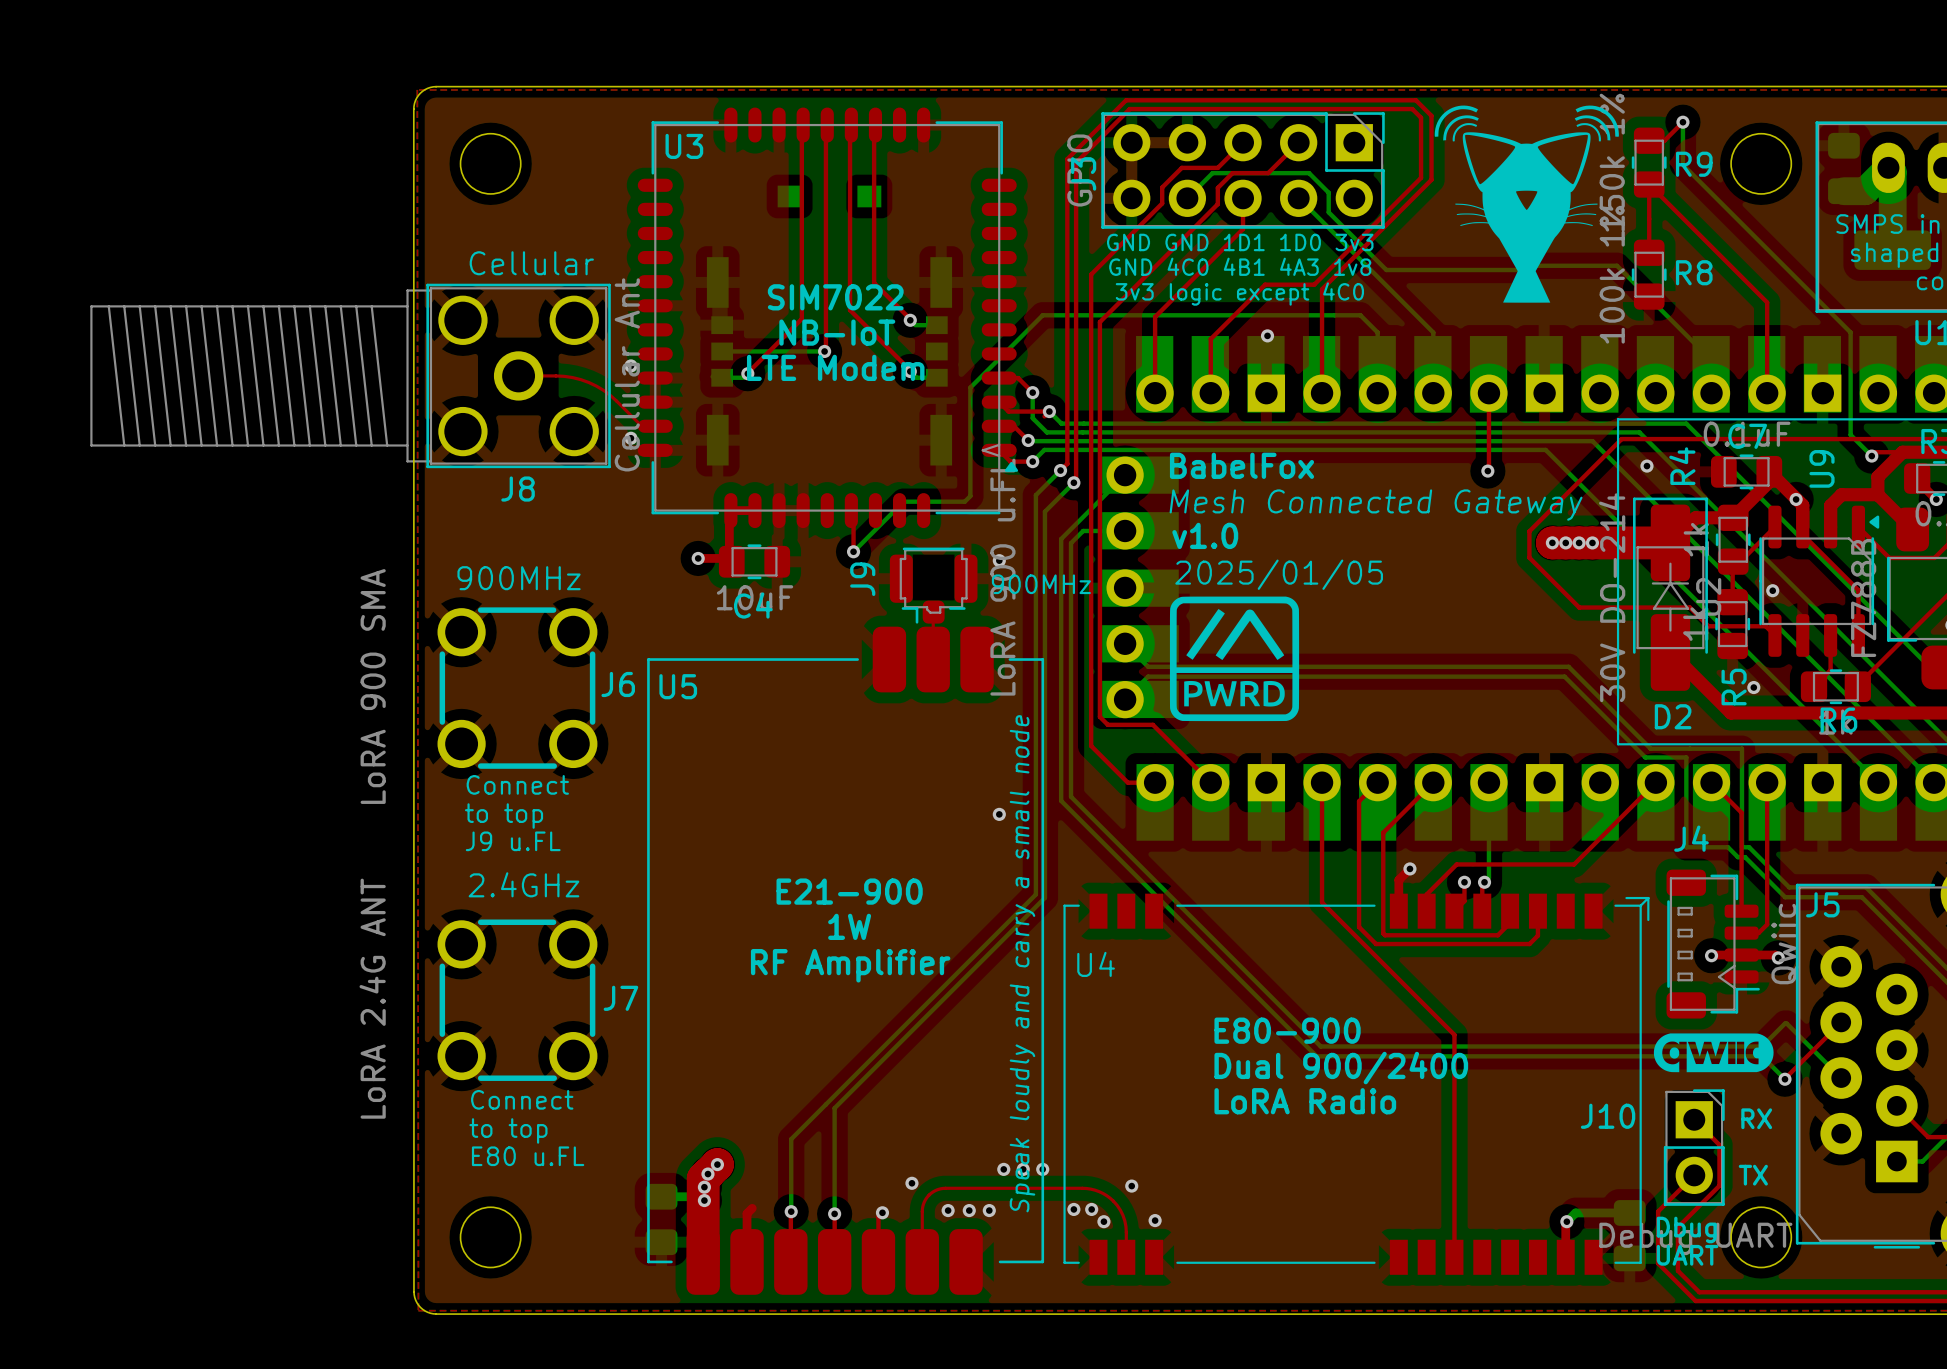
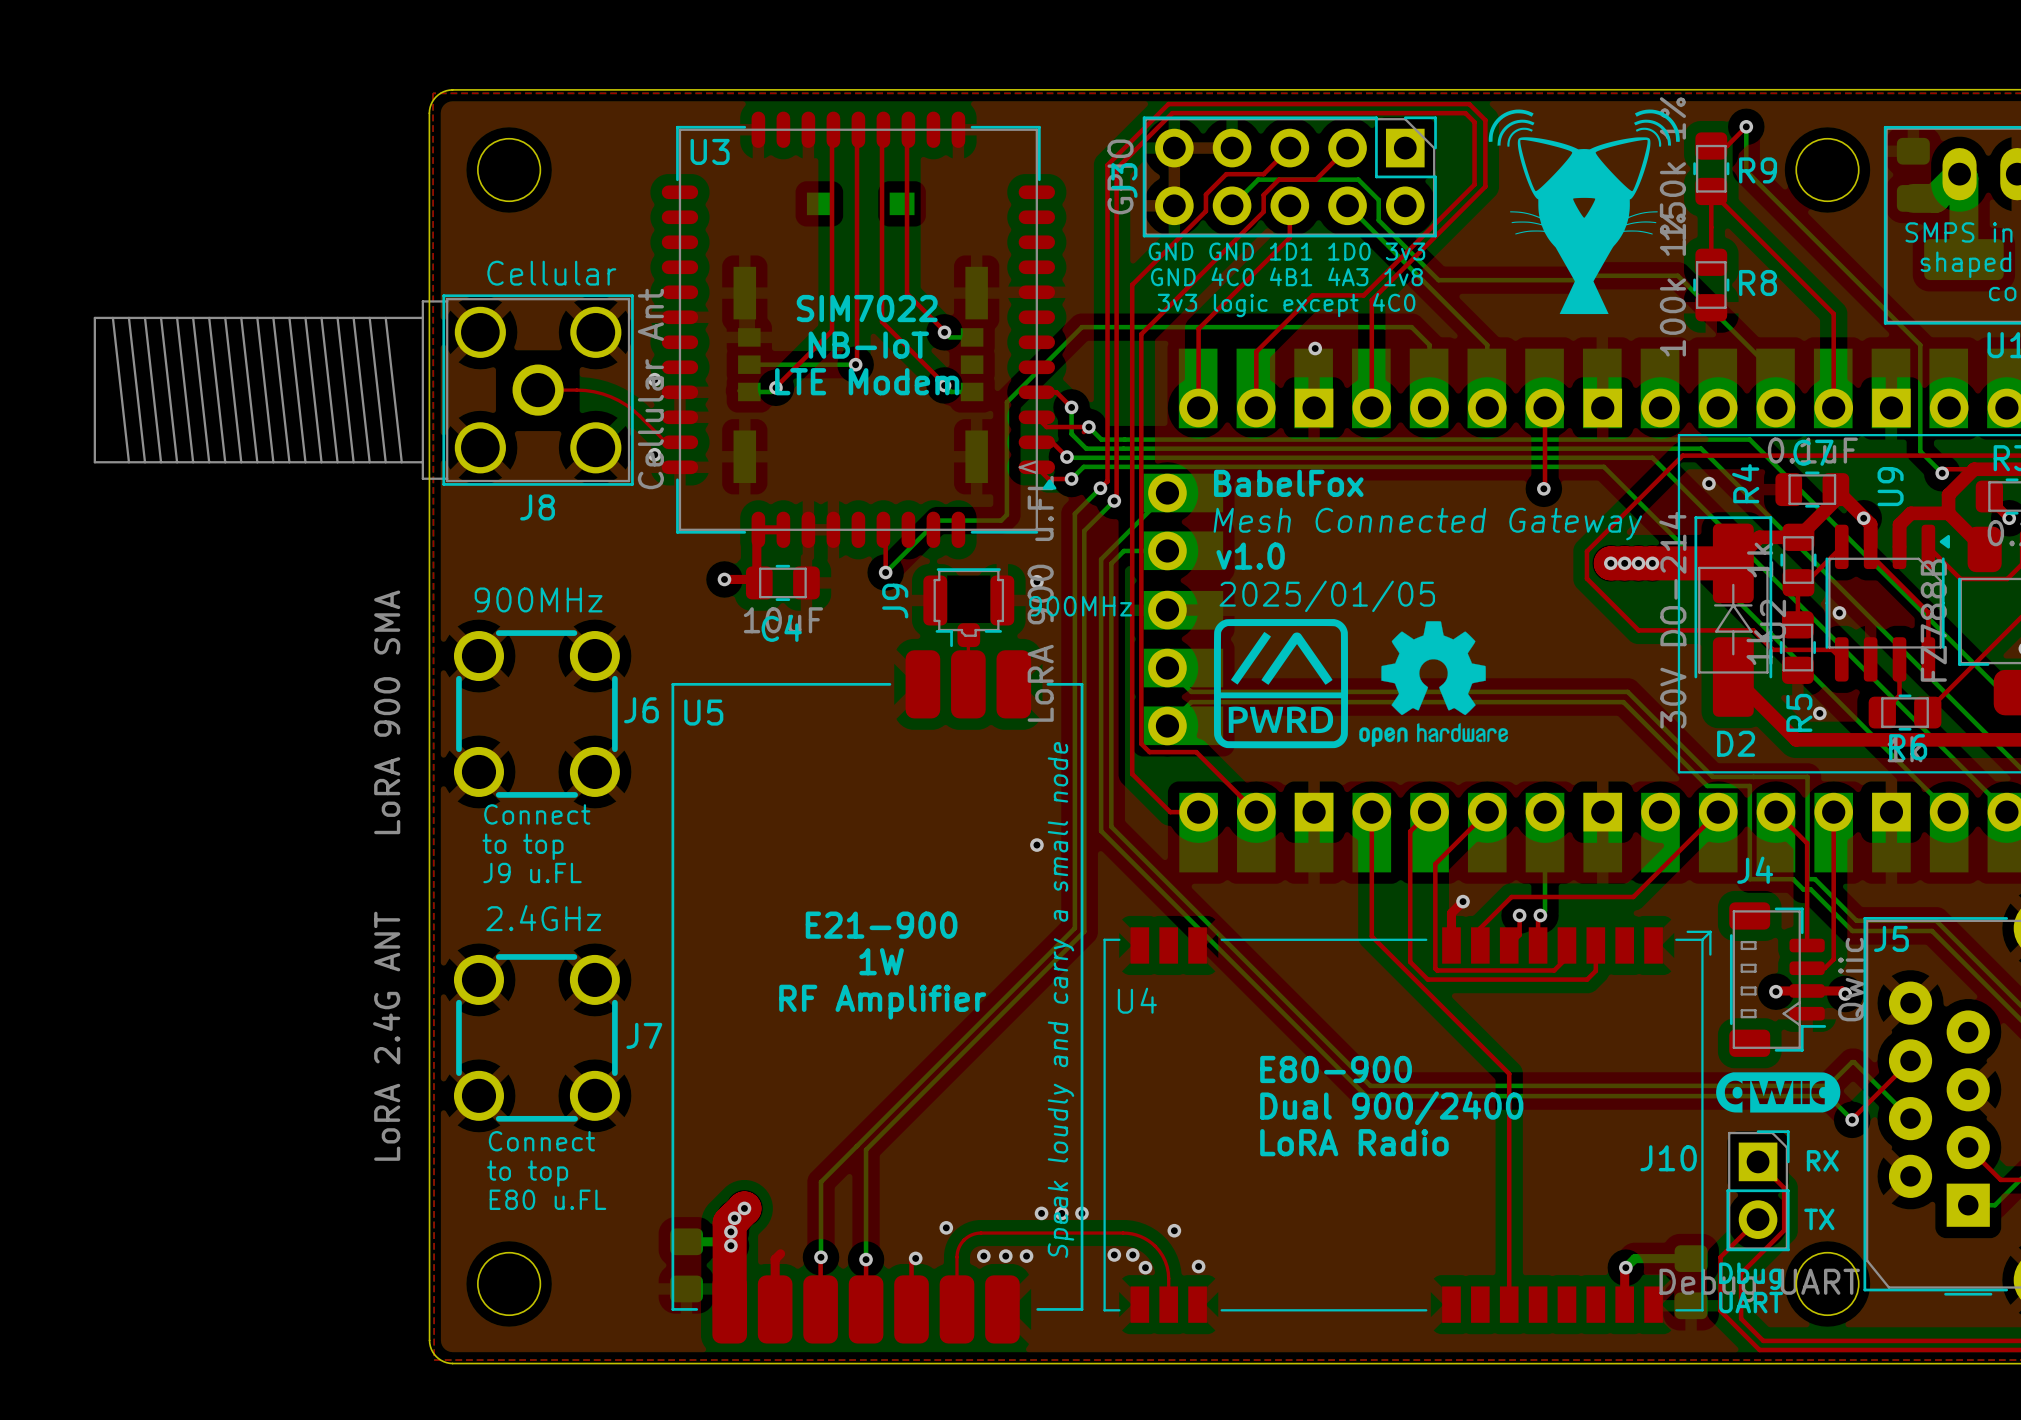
drawing: none -> [1359, 621, 1508, 748]

